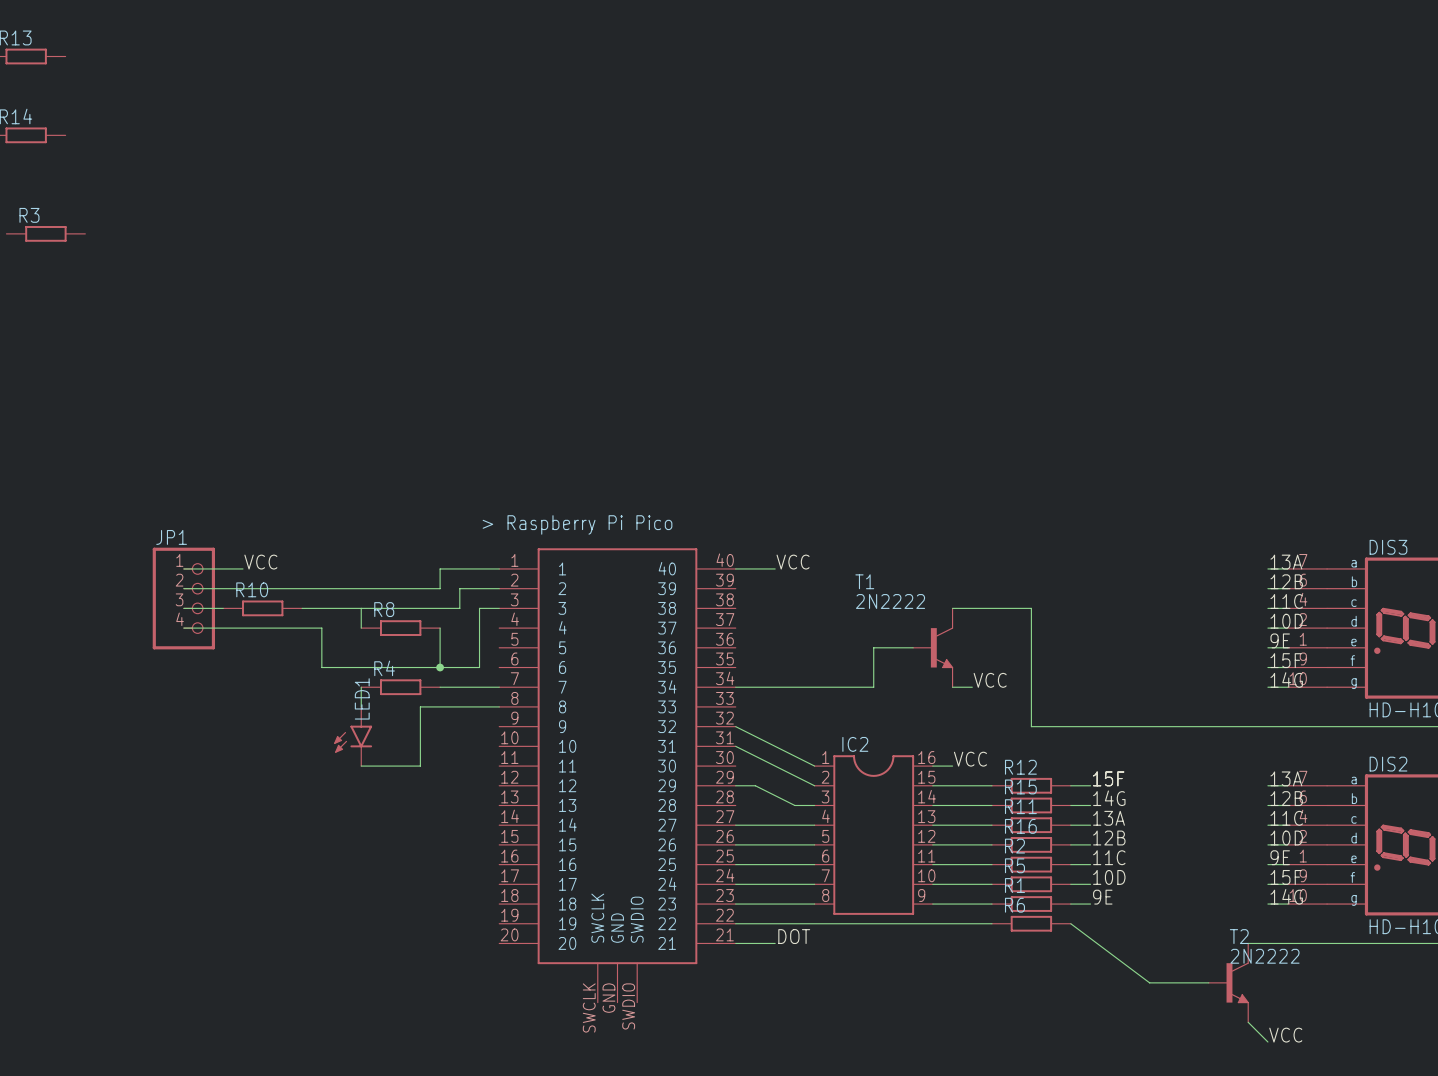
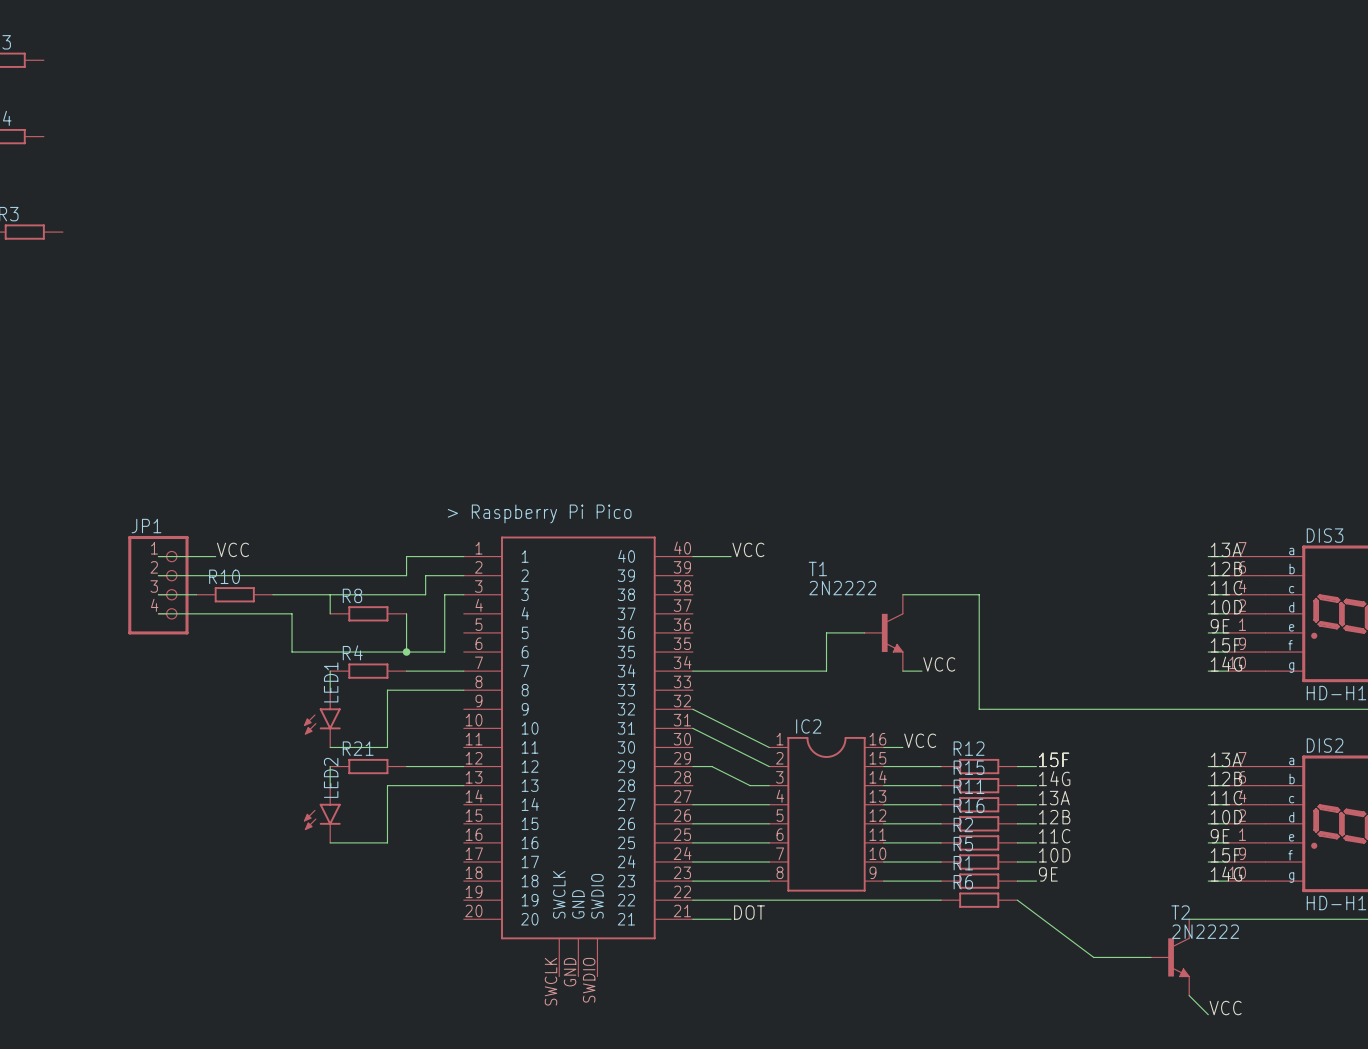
wire: none -> (330, 766) (330, 785)
R21: none -> (368, 766)
wire: none -> (406, 766) (463, 766)
wire: none -> (463, 785) (387, 785) (387, 842) (330, 842)
LED2: none -> (322, 814)

